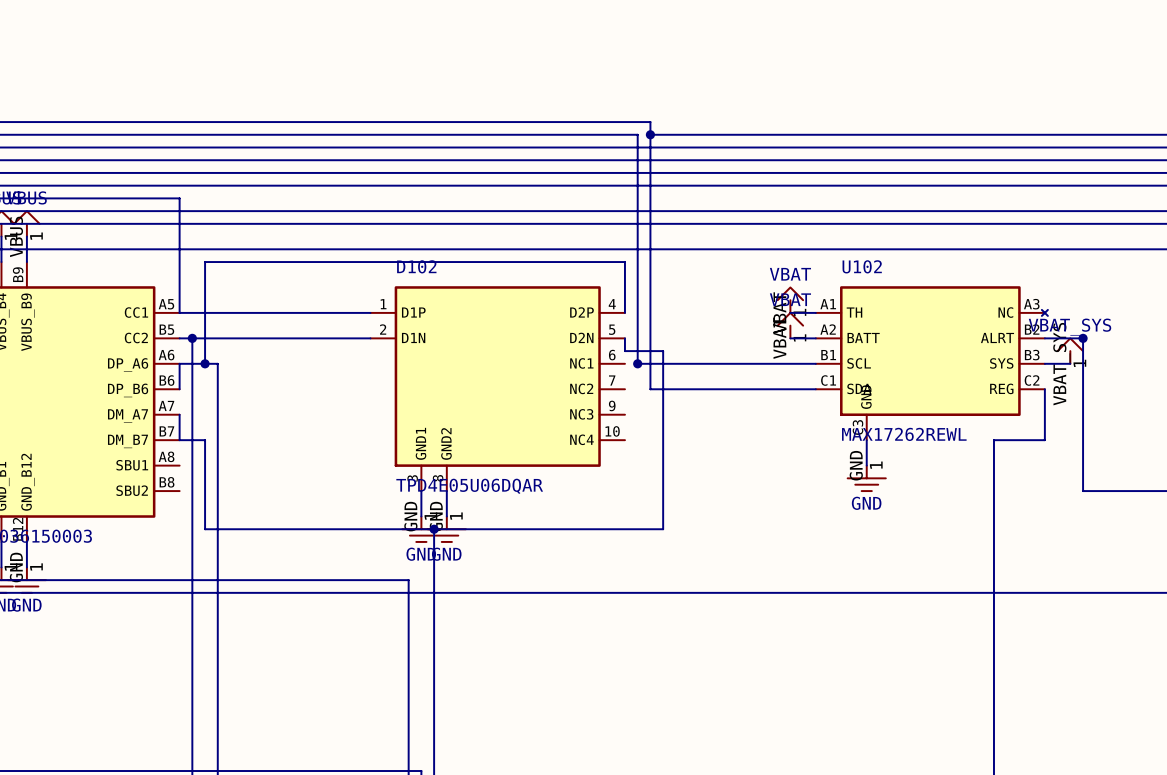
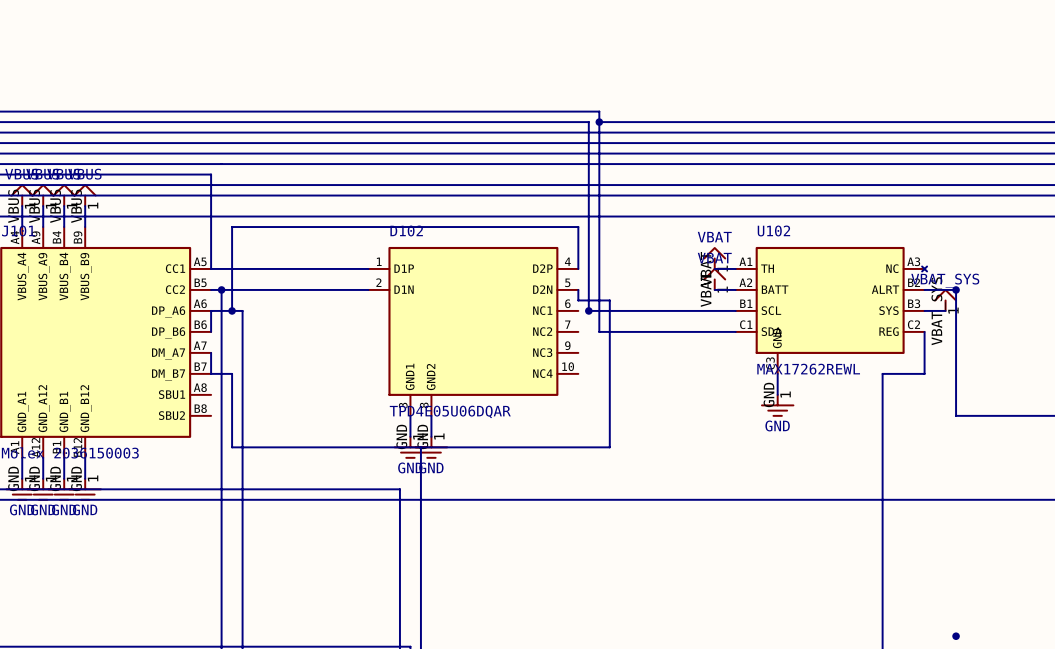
junction: (434, 529) -> none
junction: none -> (956, 636)

